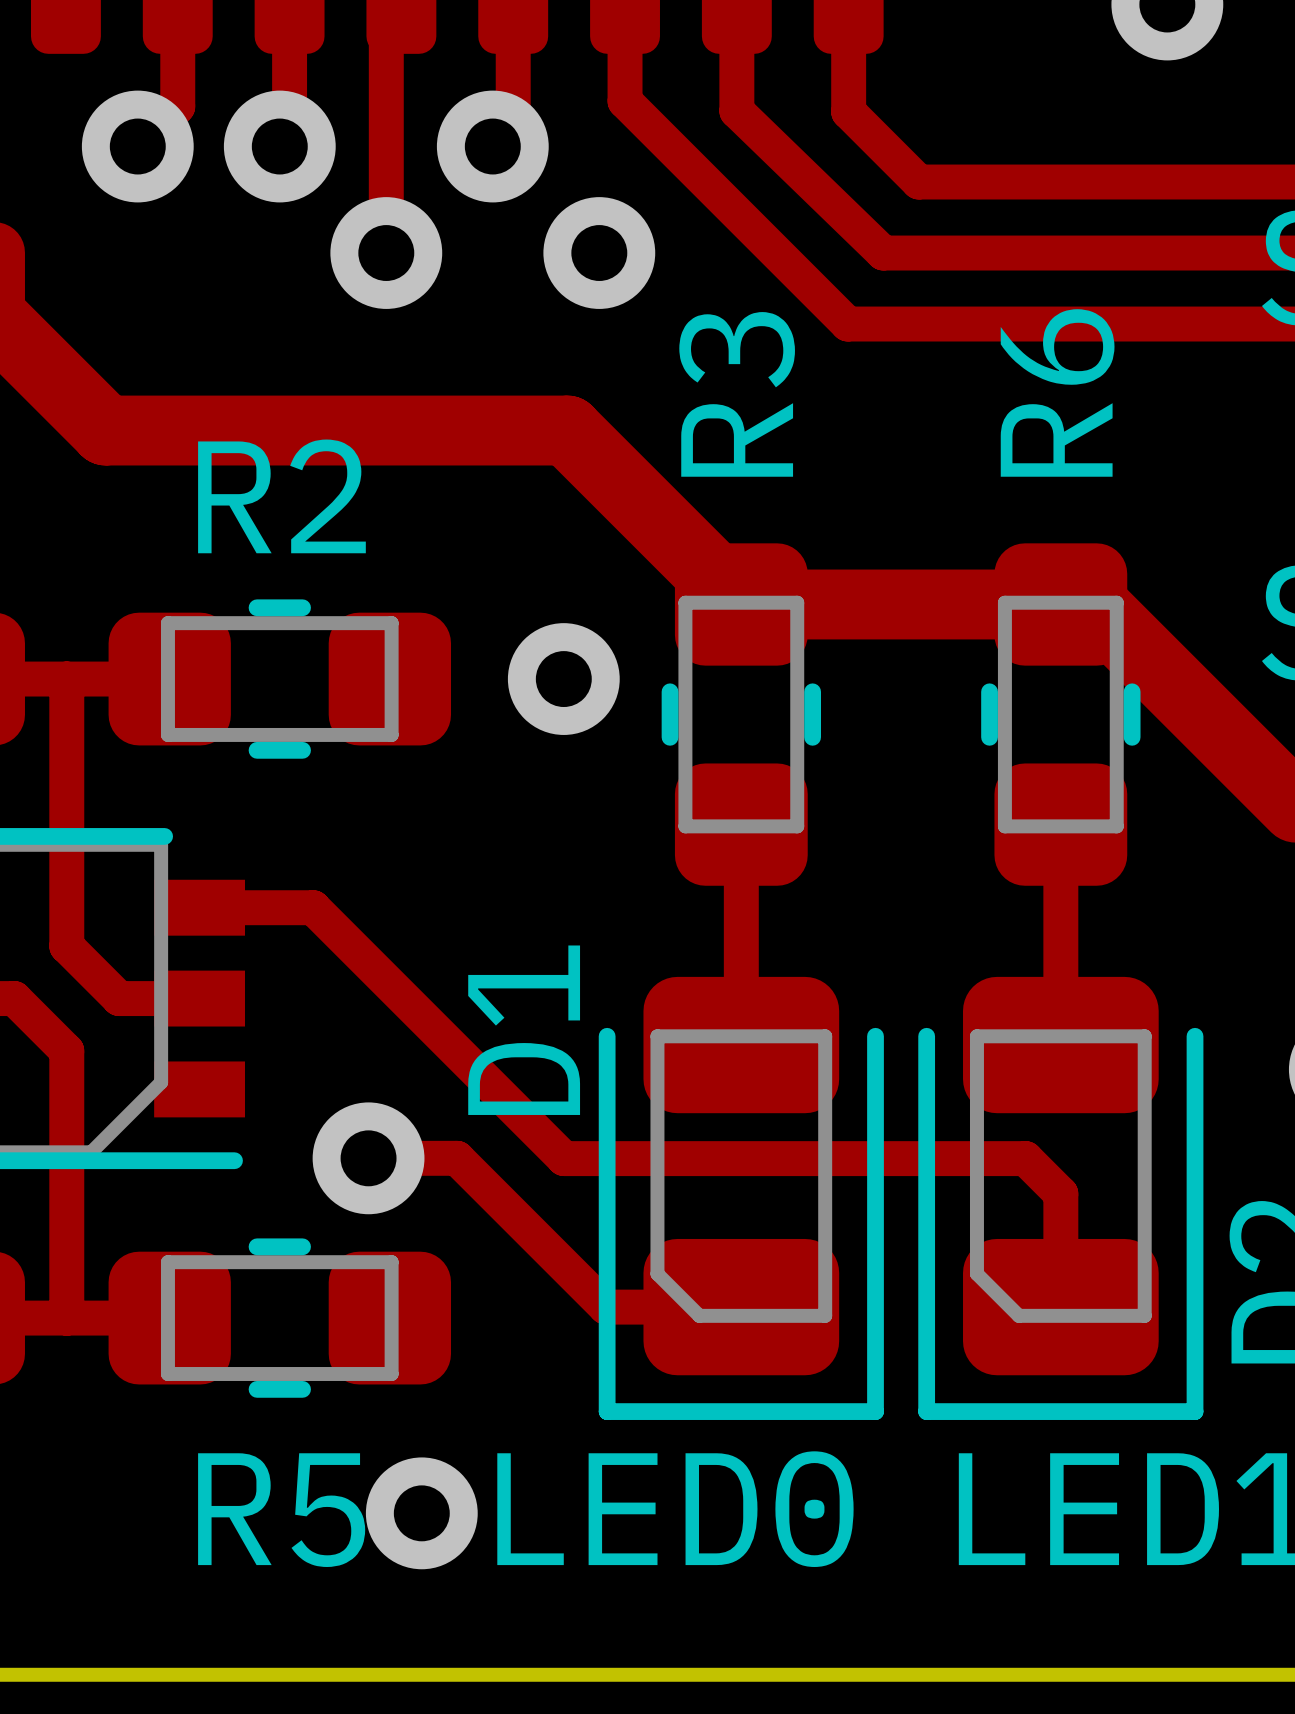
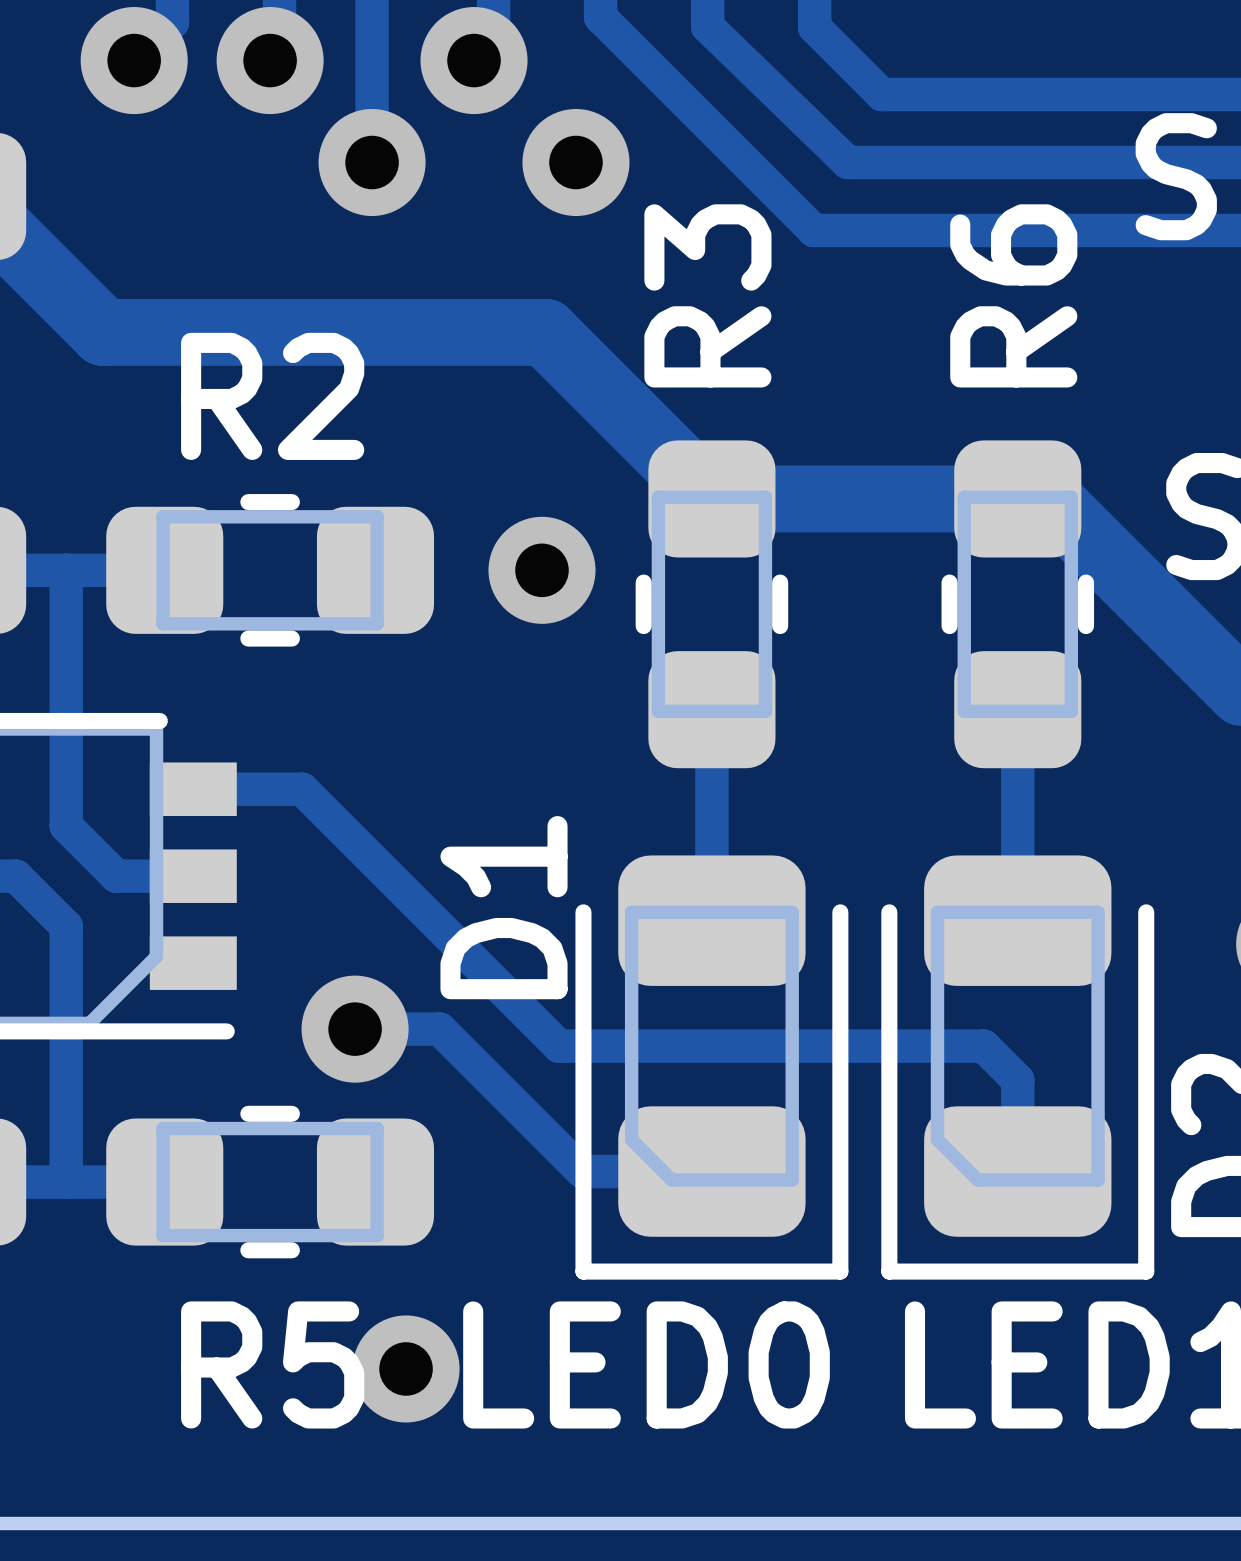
track: (564, 1158) (1025, 1158) (1060, 1193) (1060, 1211) -> (542, 1029) (558, 1046) (983, 1046) (1017, 1080)

